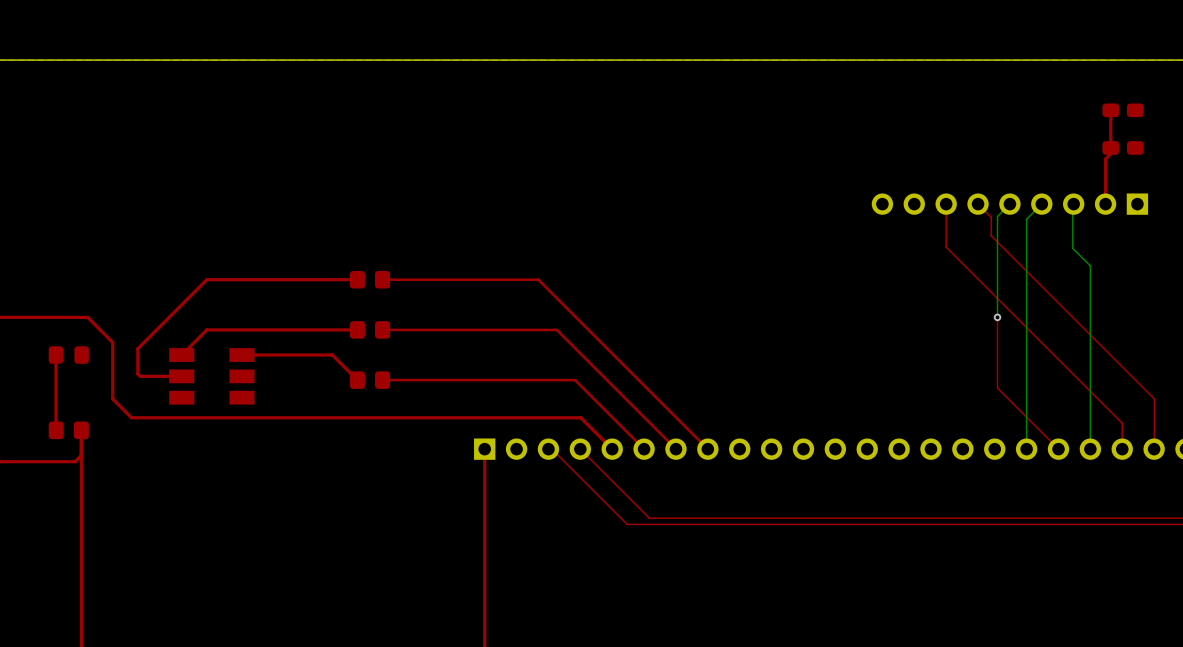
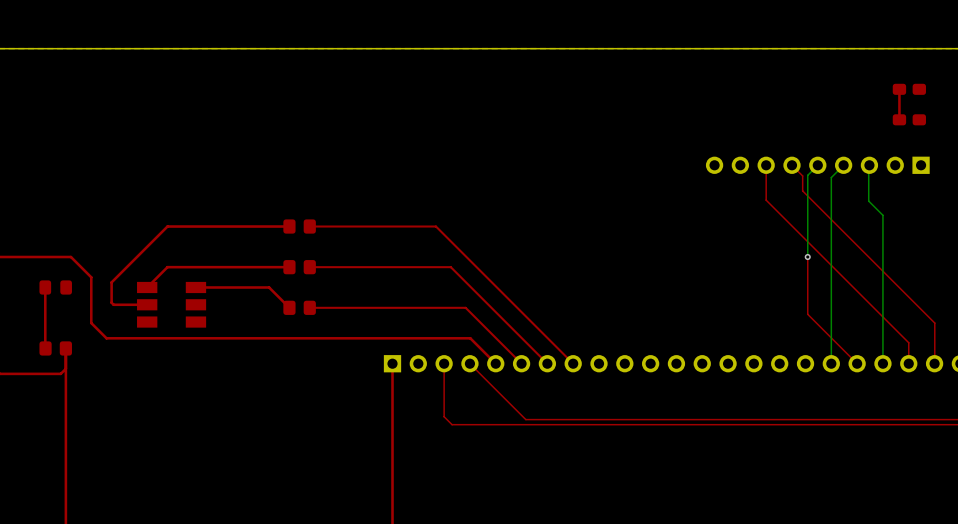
top track: (1110, 147) (1110, 153) (1105, 159) (1105, 204) -> none
top track: (548, 449) (551, 449) (627, 524) -> (444, 363) (444, 416) (452, 424) (507, 424)

